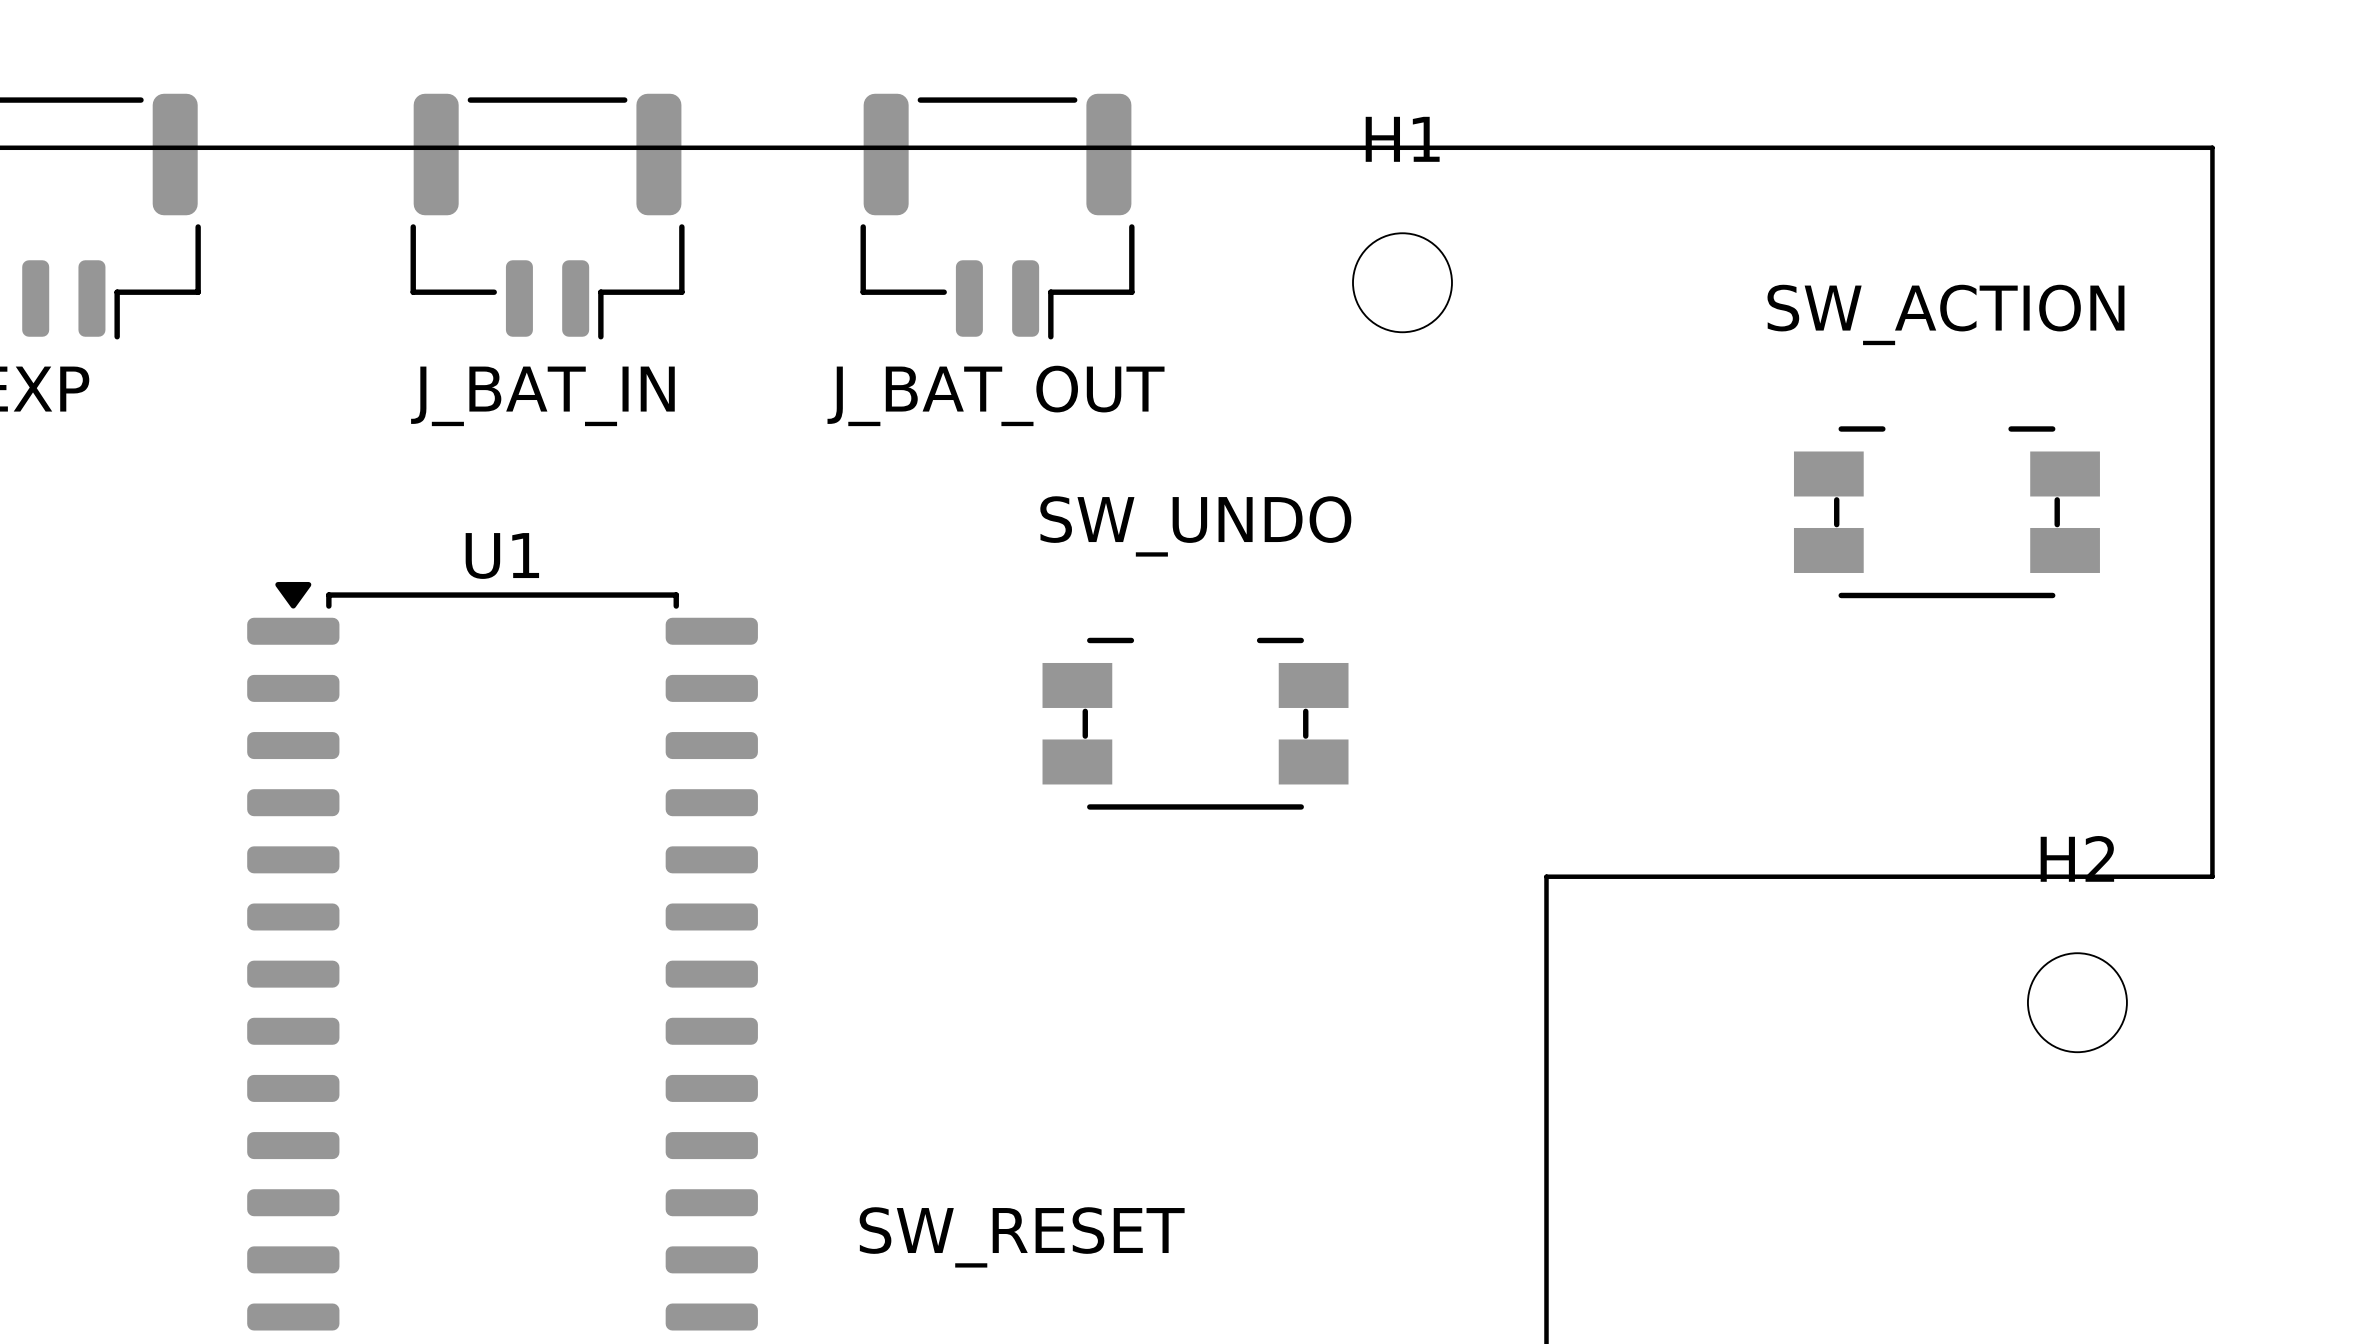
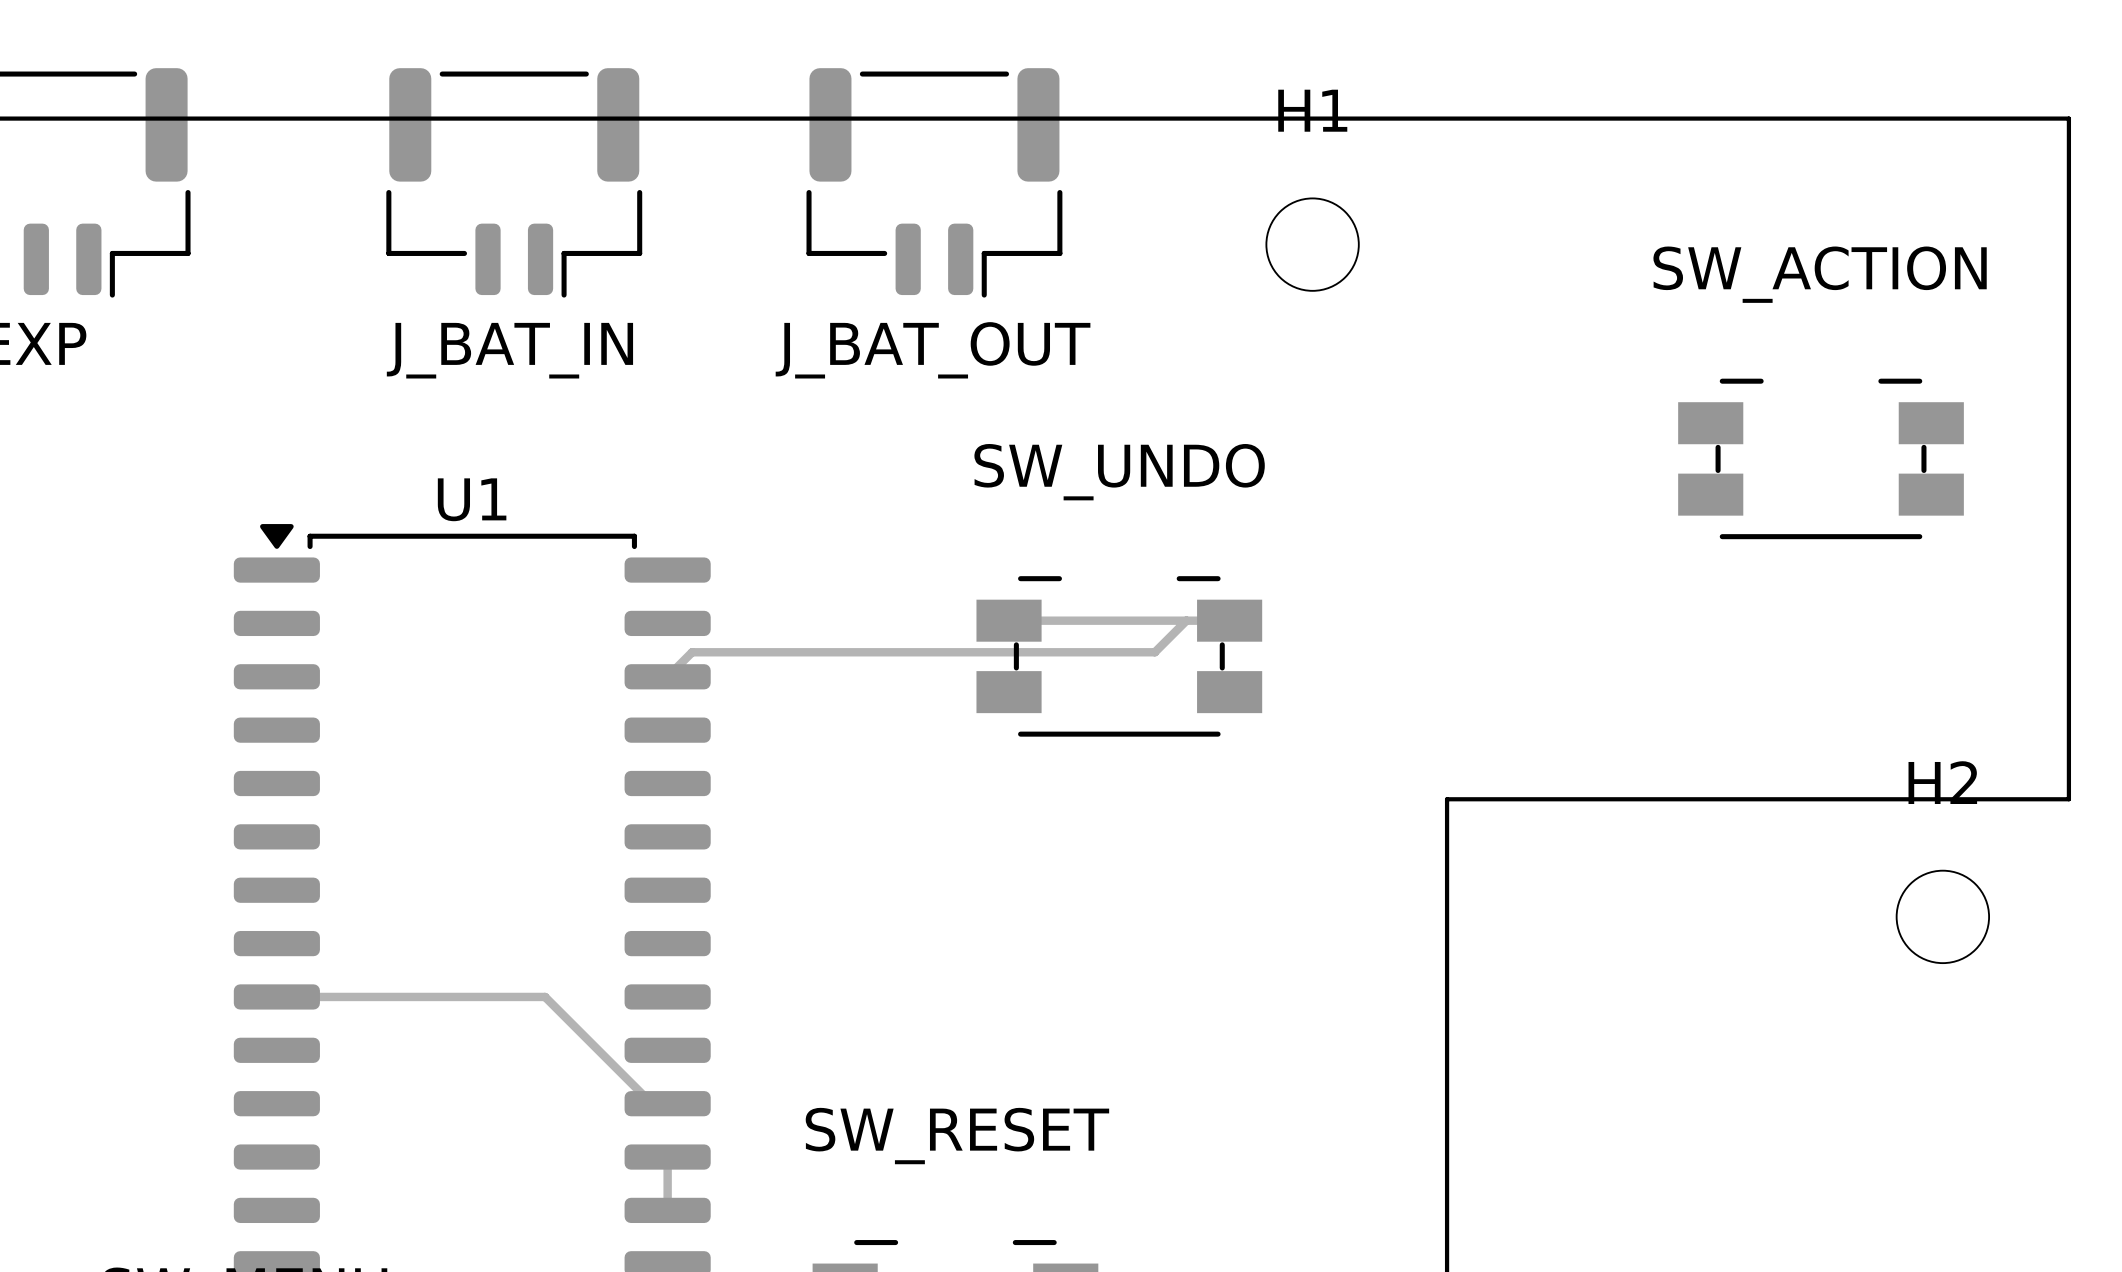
track: none -> (1009, 620) (1229, 620)
track: none -> (1186, 620) (1154, 652) (692, 652) (667, 676)
track: none -> (276, 996) (545, 996) (651, 1103) (667, 1103)
track: none -> (667, 1157) (667, 1210)

